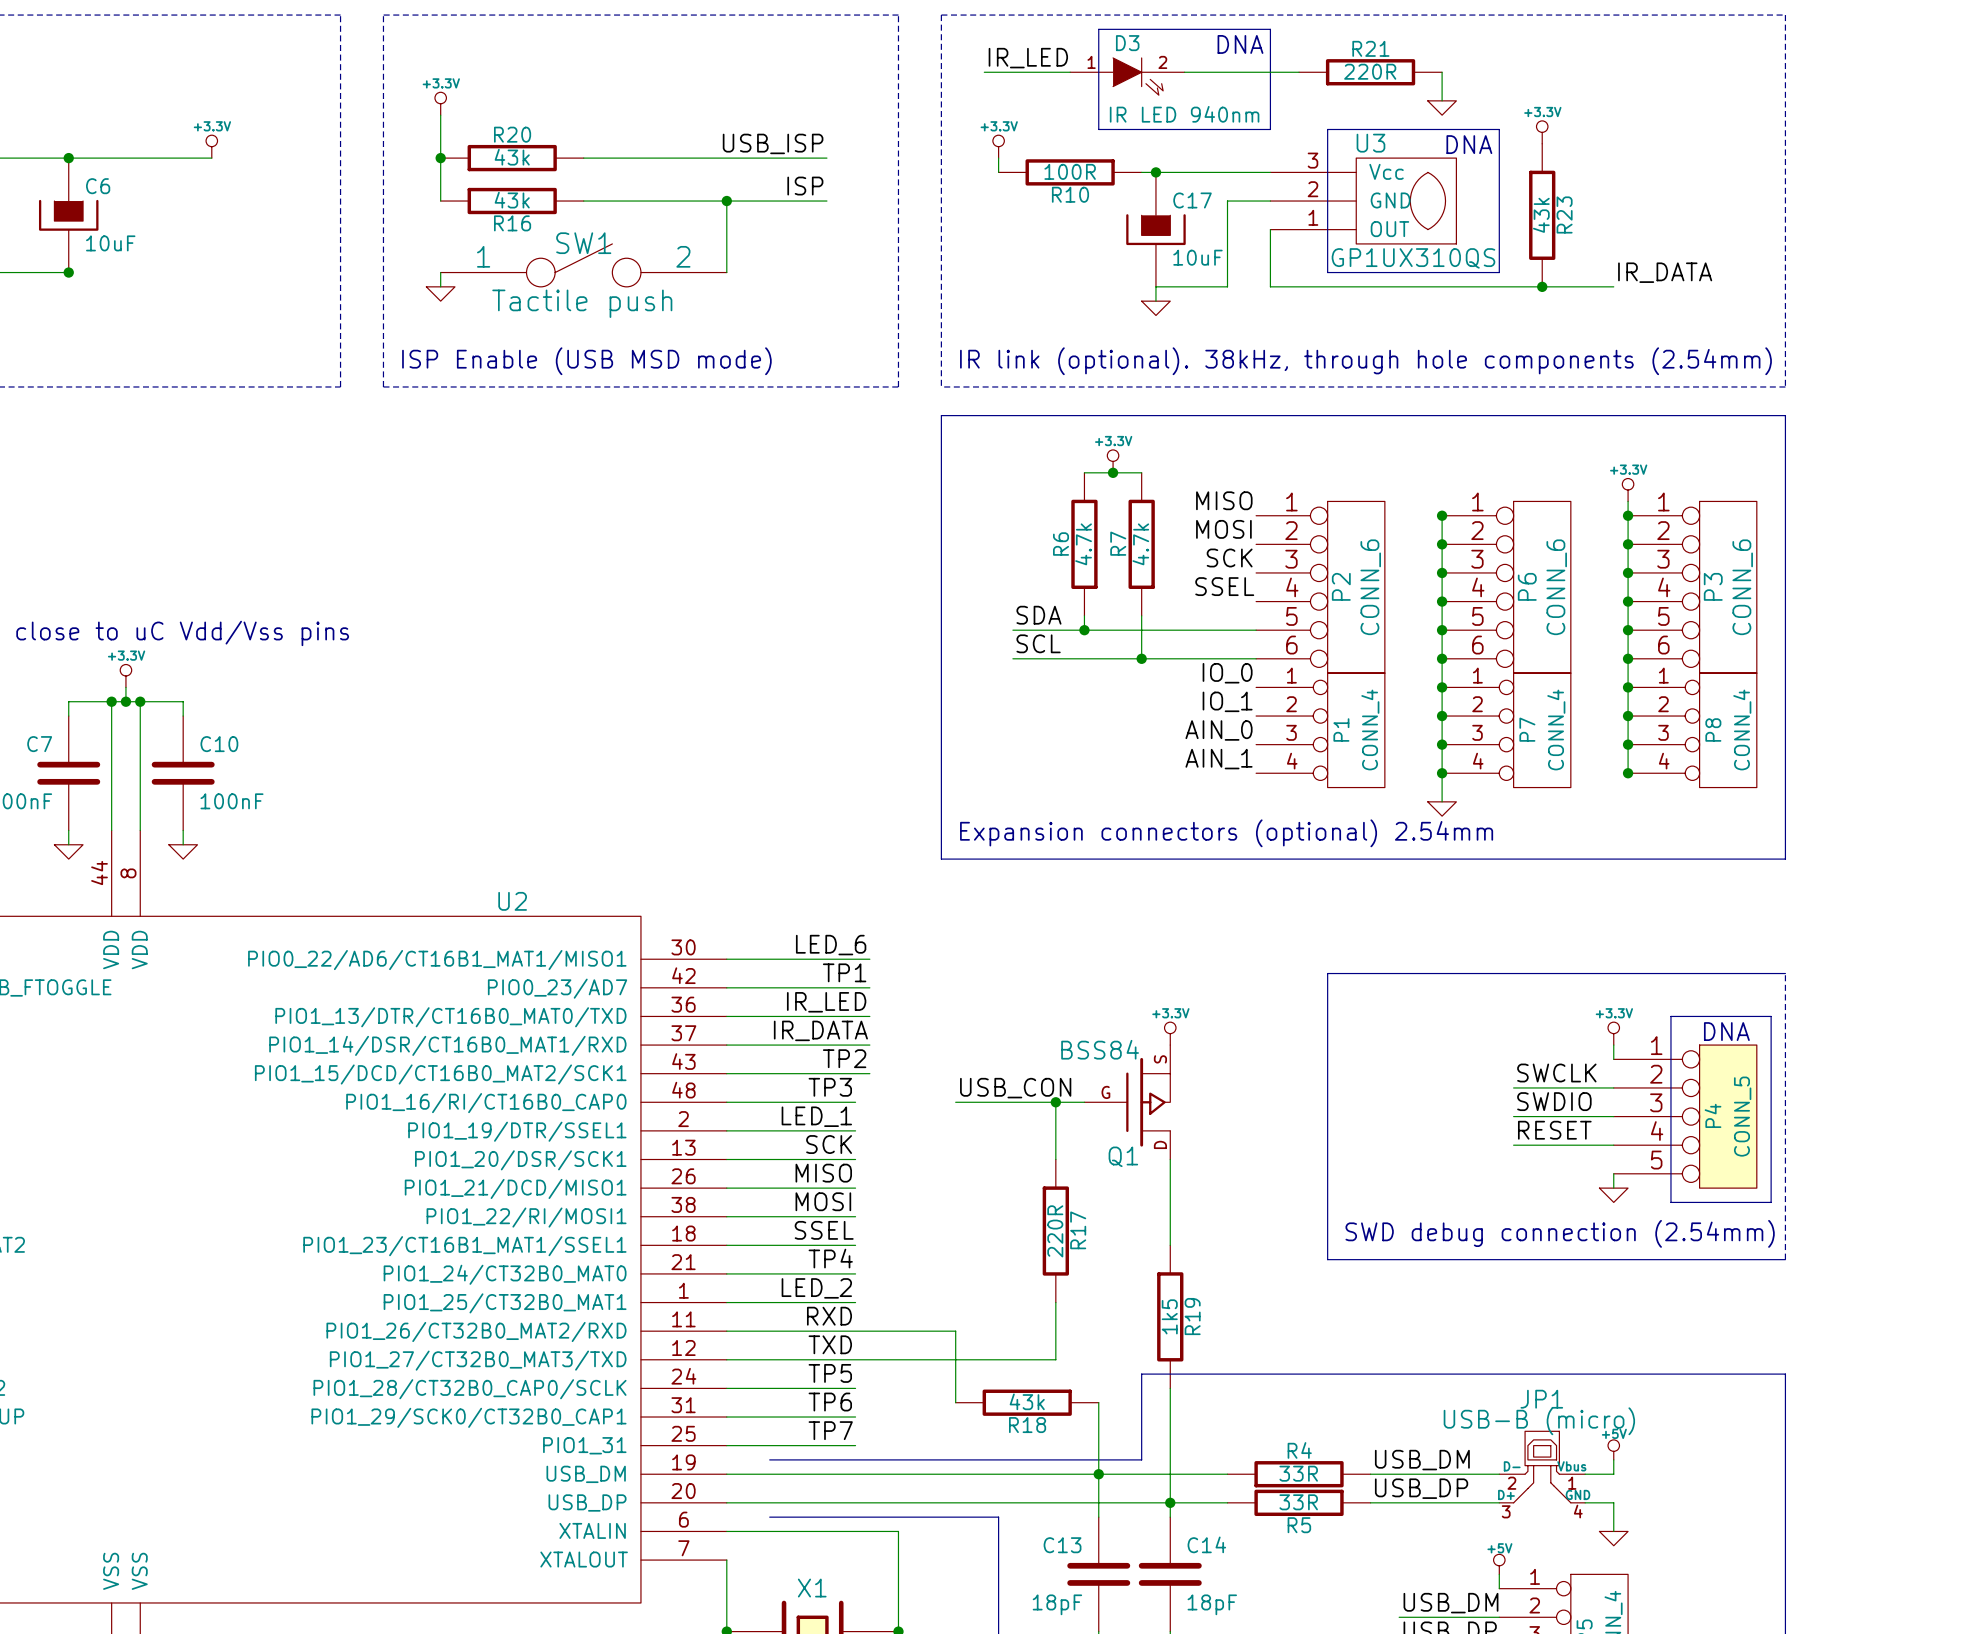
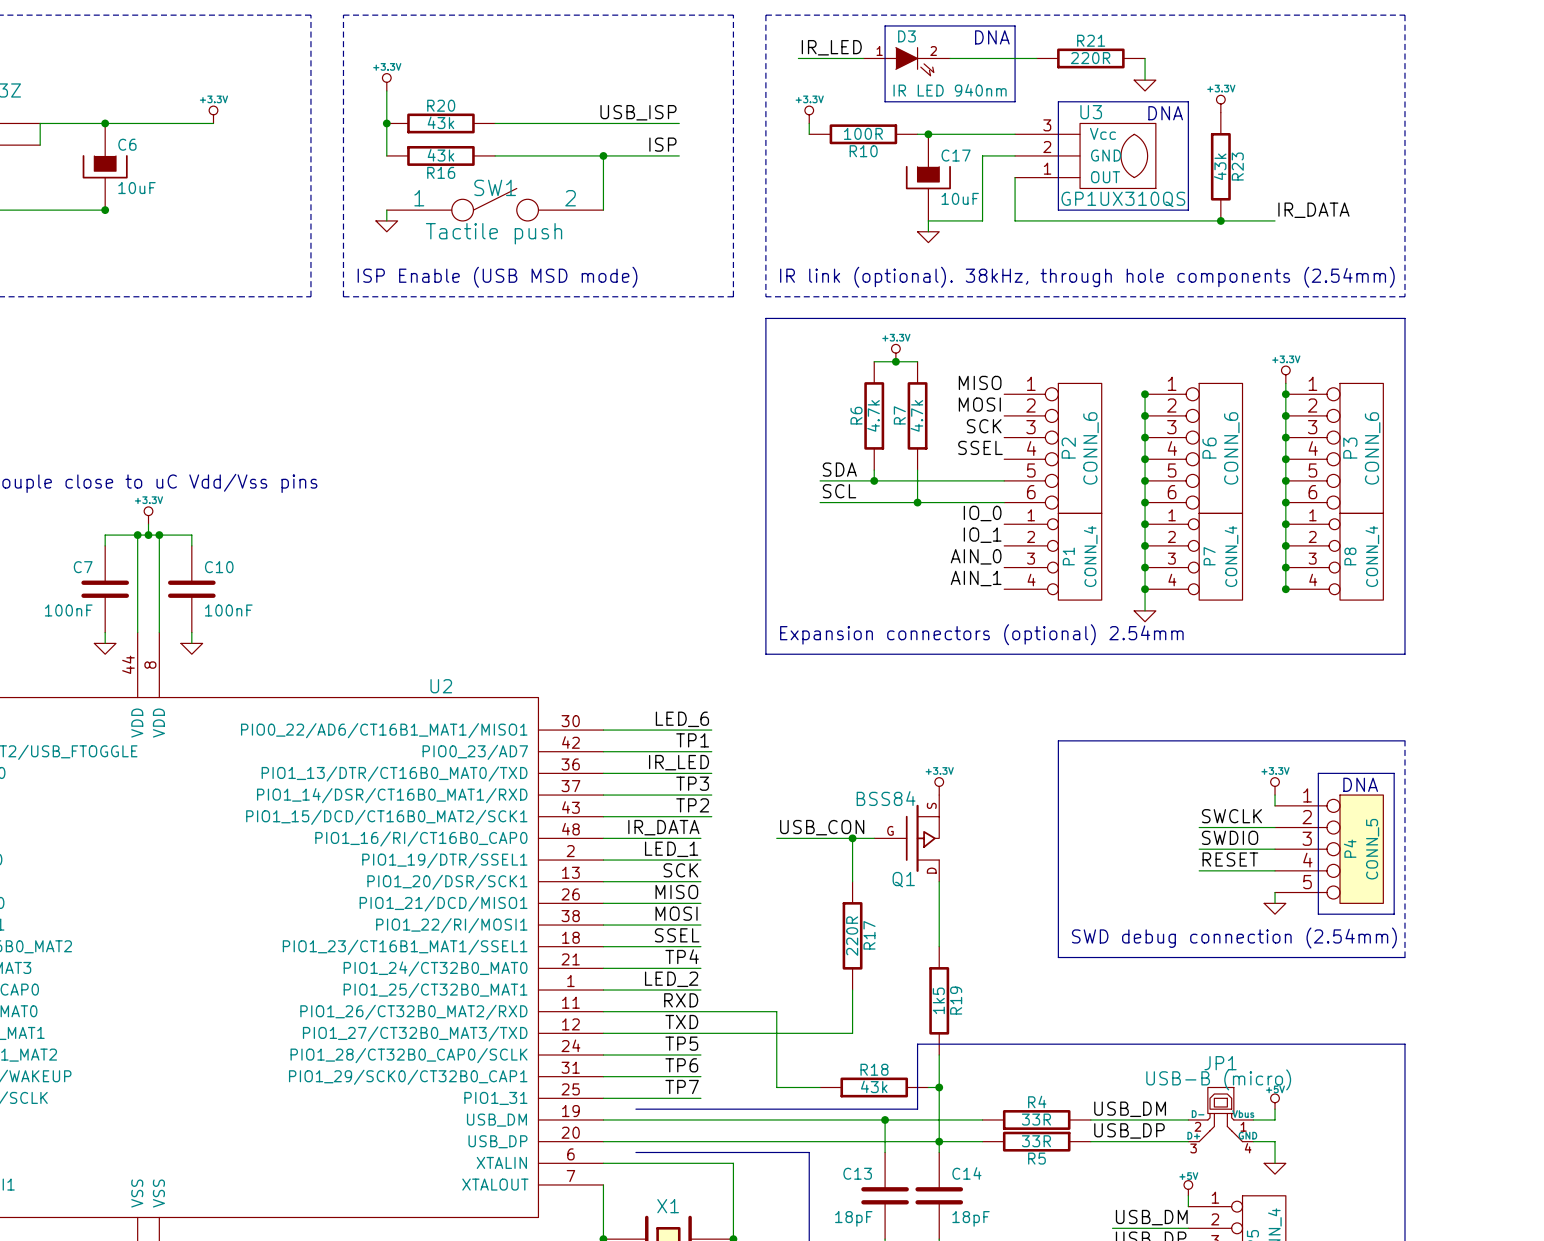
label: IR_DATA (820, 1030) -> TP3 (692, 783)
label: TP3 (830, 1087) -> IR_DATA (663, 827)
wire: none -> (776, 1065) (776, 1087) (820, 1087)
R18 position: (1027, 1402) -> (874, 1087)
wire: (1098, 1402) (1098, 1474) -> none
R18 name position: R18 (1027, 1425) -> R18 (874, 1069)
wire: none -> (928, 1087) (939, 1087)
junction: none -> (939, 1087)

